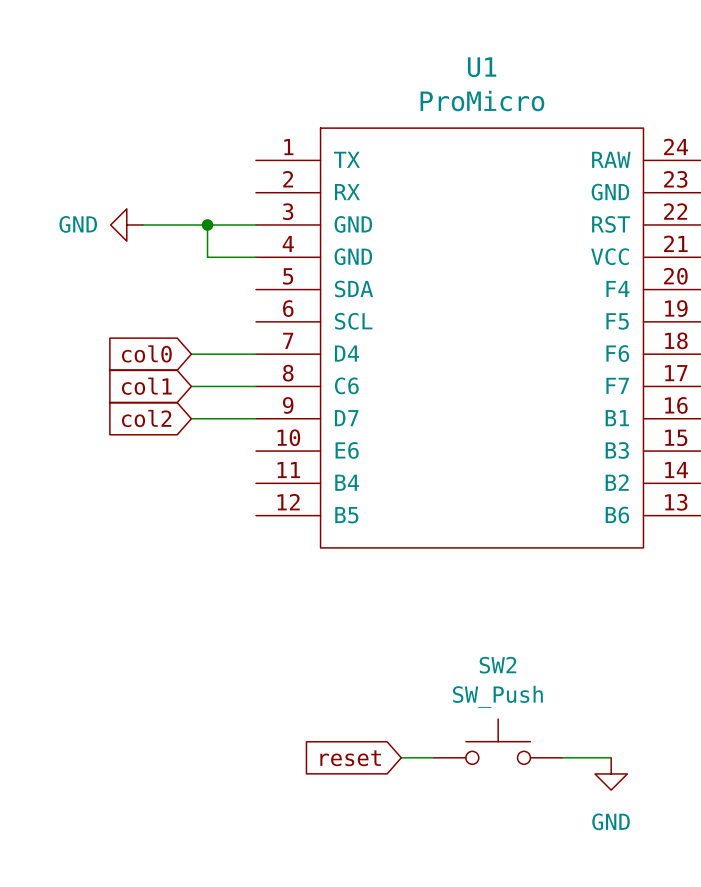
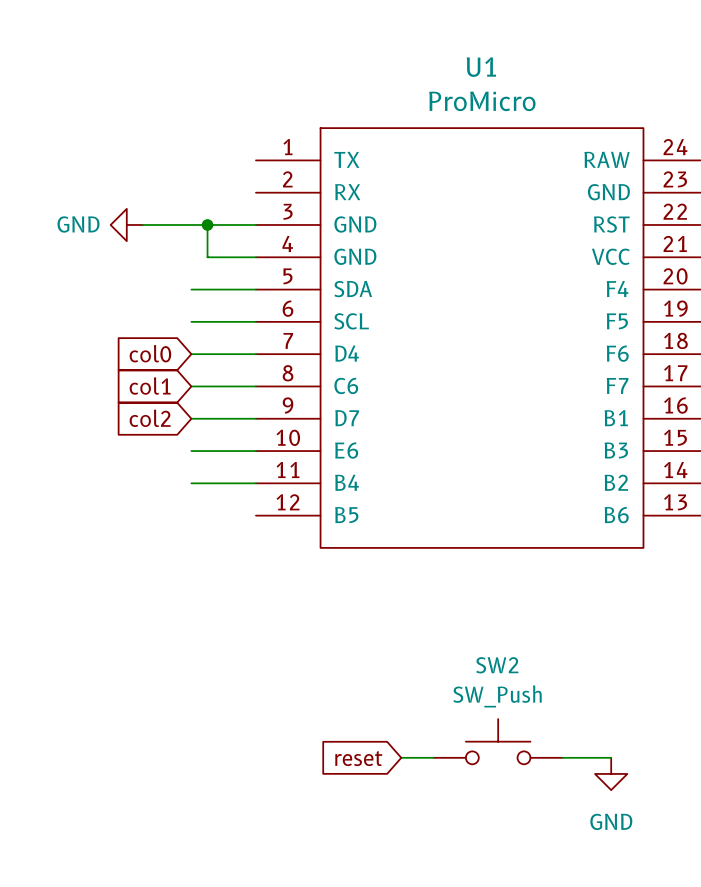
wire: none -> (191, 289) (255, 289)
wire: none -> (191, 321) (255, 321)
wire: none -> (191, 451) (255, 451)
wire: none -> (191, 483) (255, 483)

